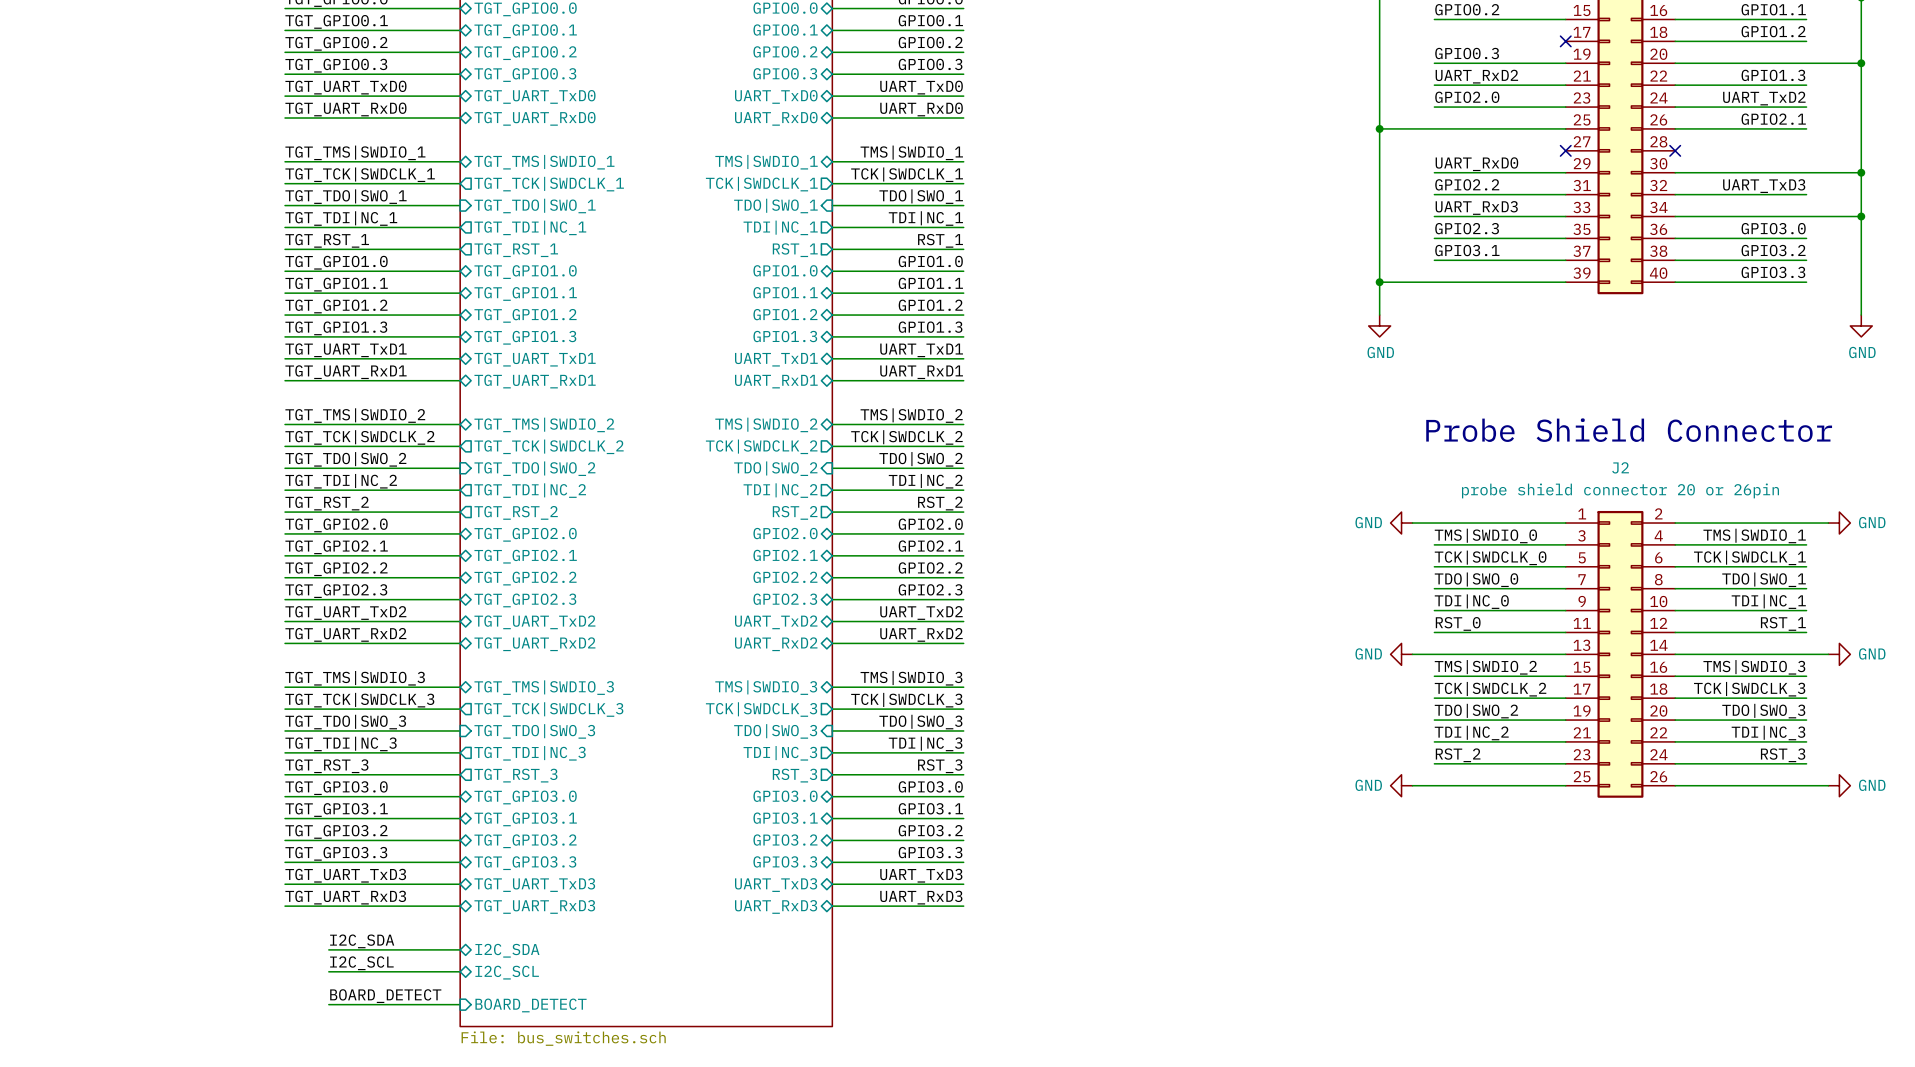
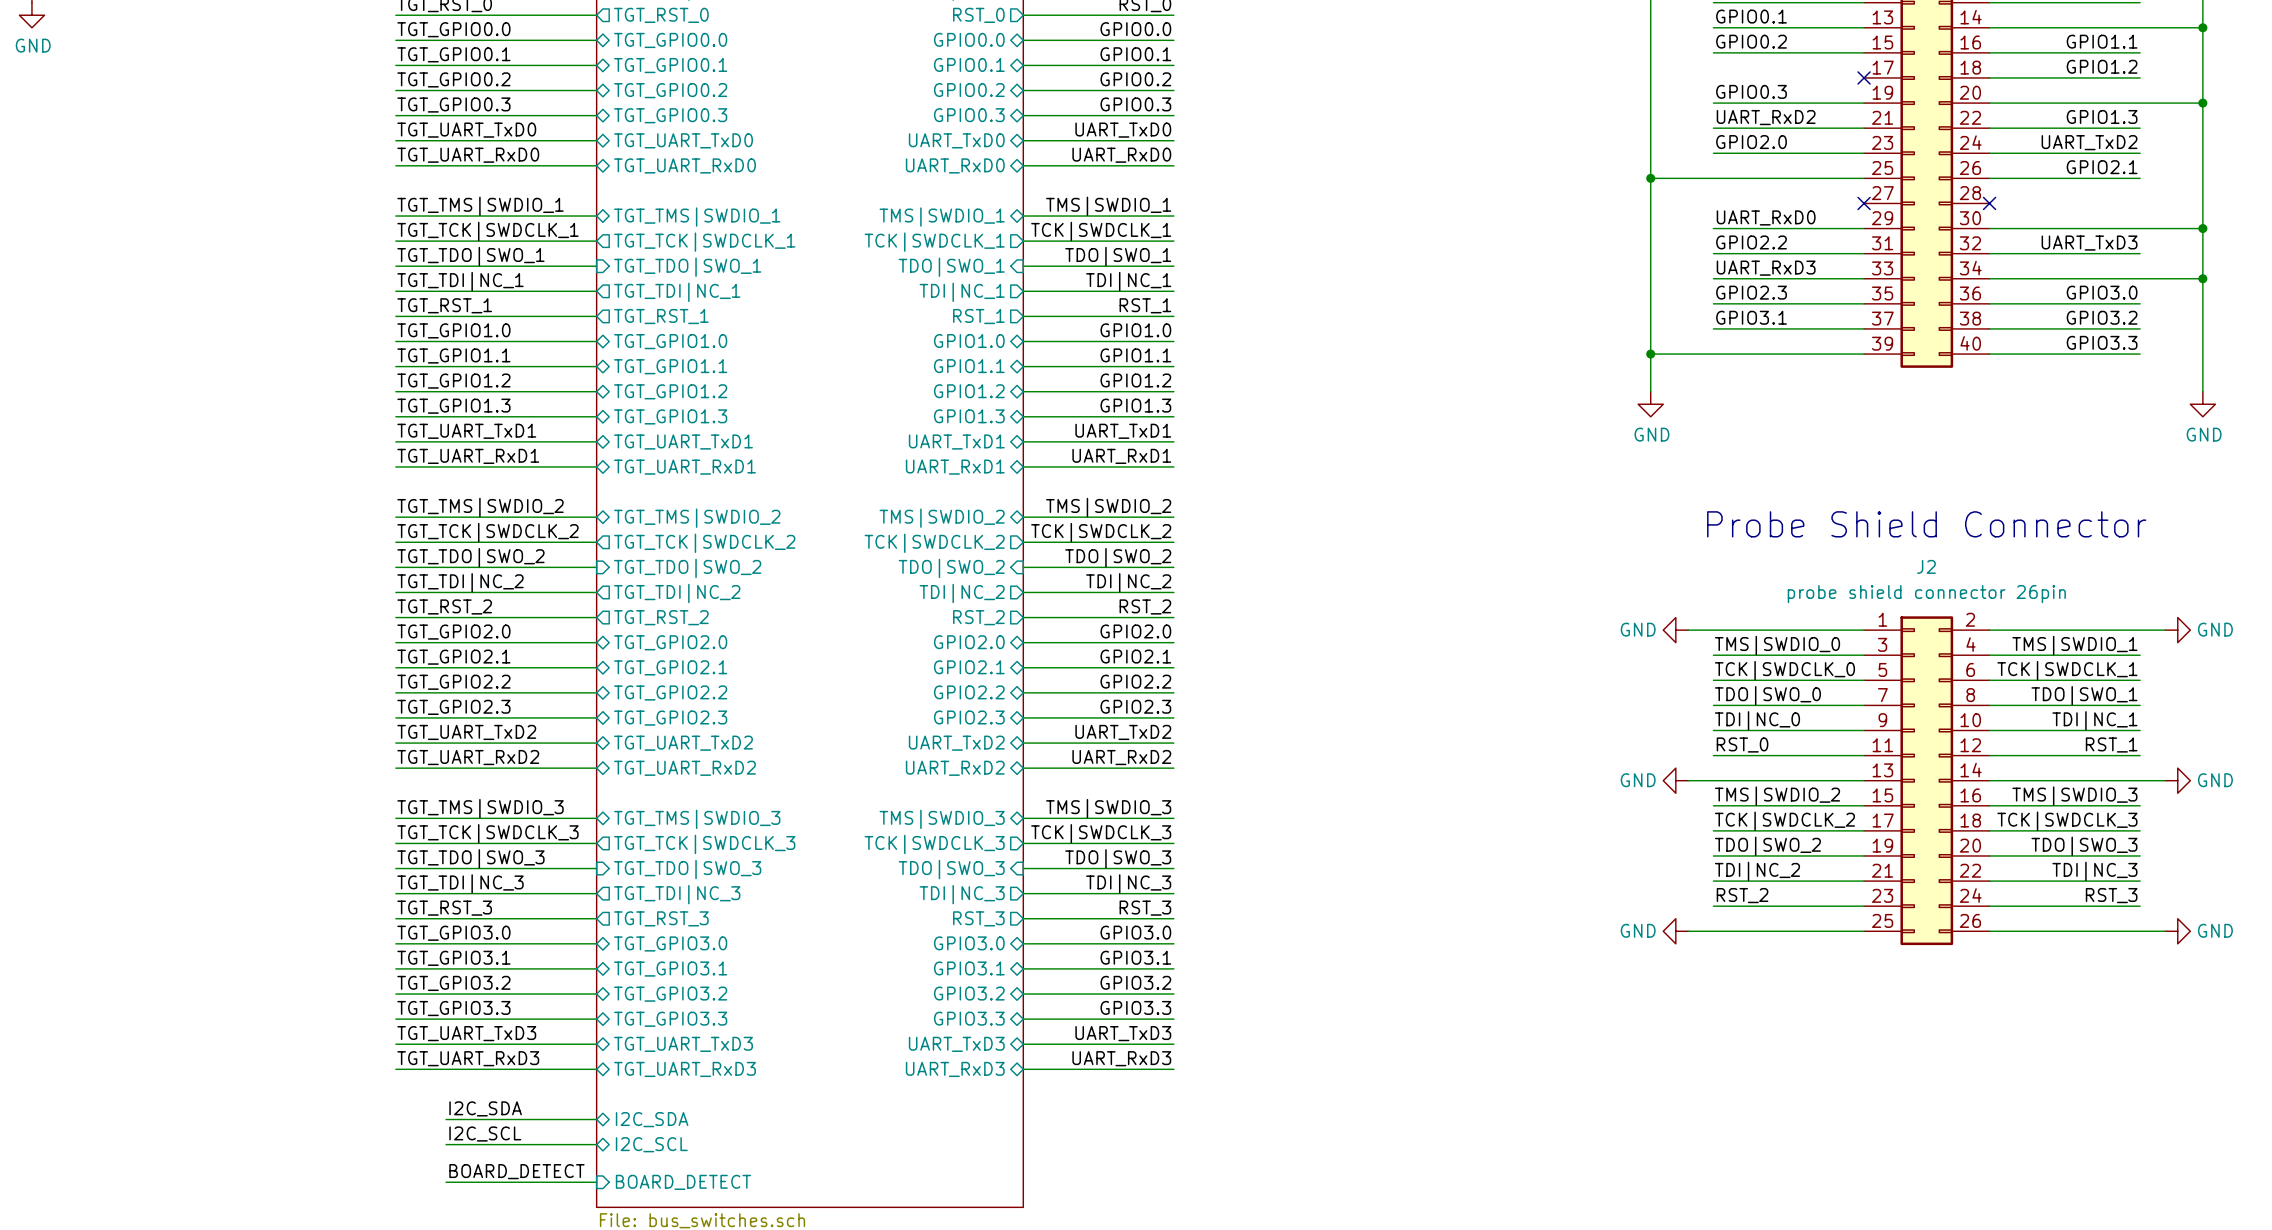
J2 value: probe shield connector 20 or 26pin (1620, 490) -> probe shield connector 26pin (1926, 594)

